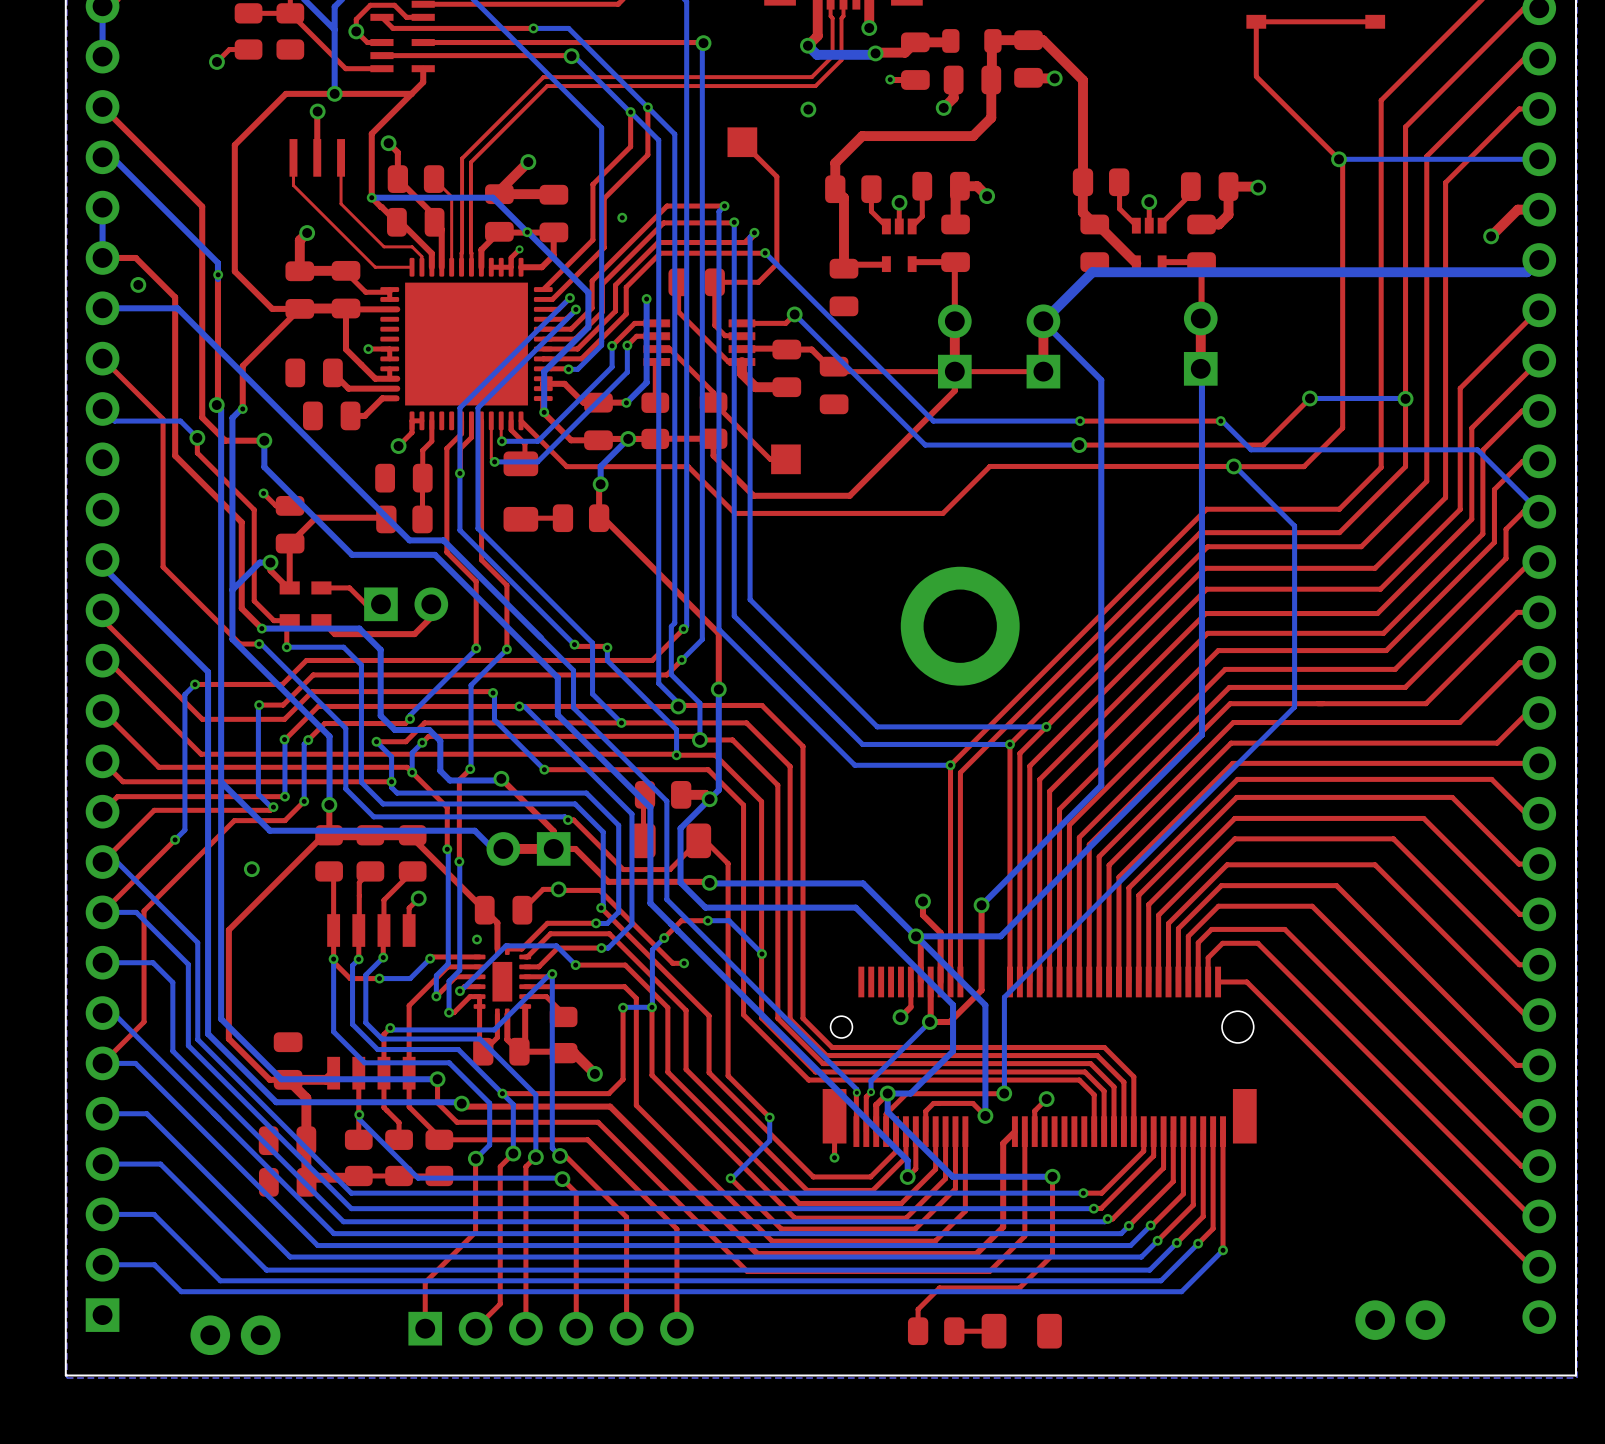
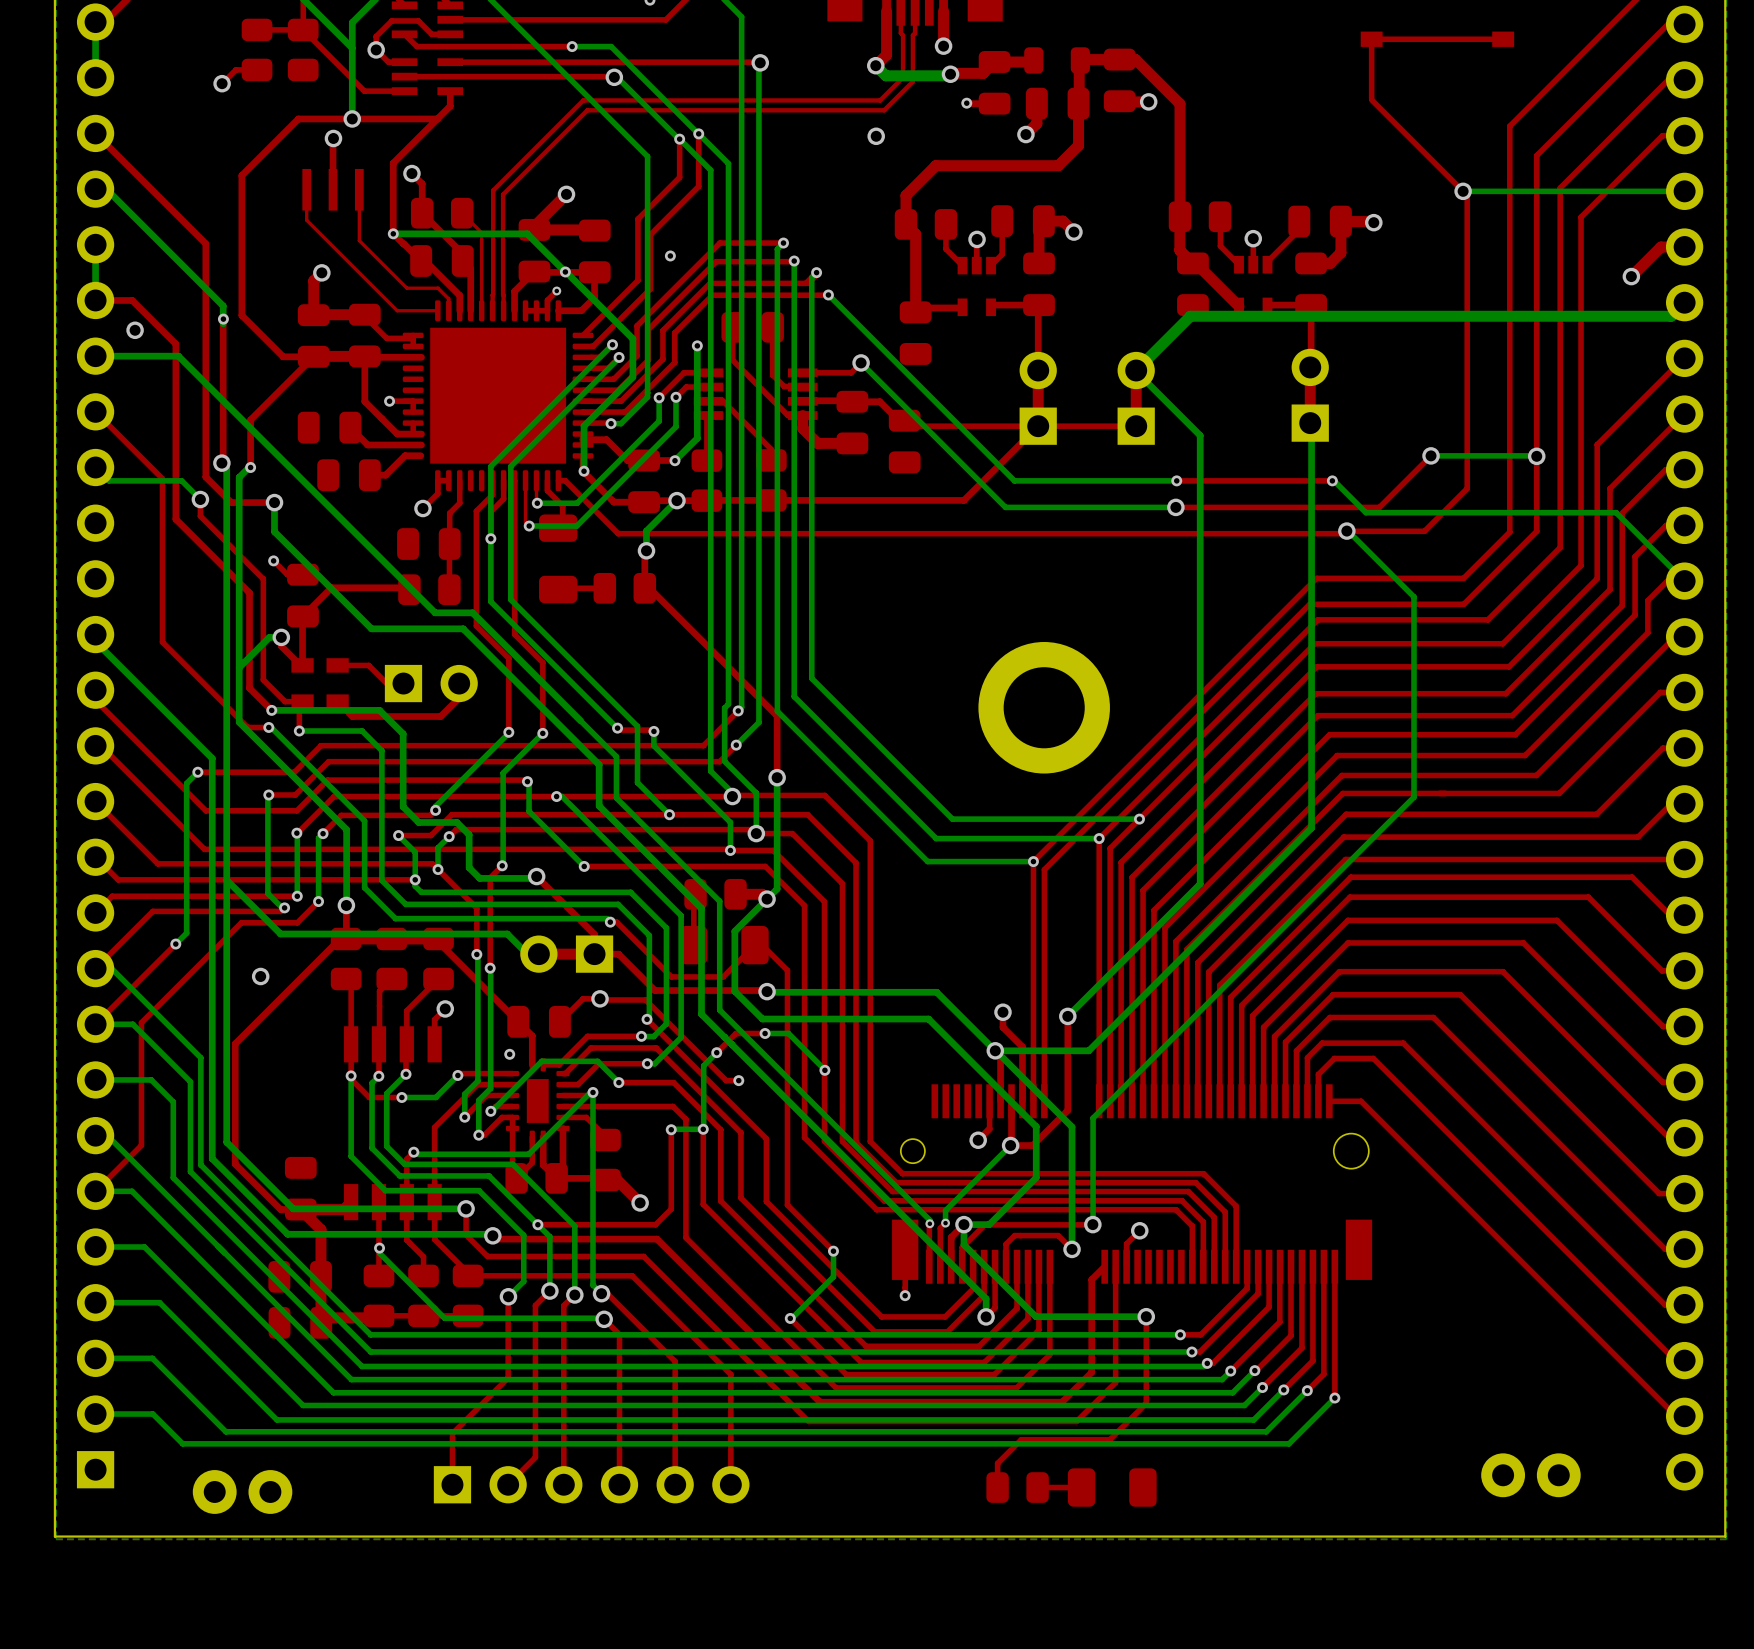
top track: (742, 142) (776, 176) (776, 263) (758, 282) (714, 282) -> none
part: (742, 142) -> none
top track: (954, 371) (954, 390) (849, 495) (753, 495) (713, 455) (713, 438) -> (1038, 426) (963, 500) (771, 500)
top track: (713, 402) (770, 459) (785, 459) -> none
top track: (521, 420) (566, 466) (688, 466) (735, 513) (942, 513) (989, 466) (1233, 466) -> (558, 480) (565, 480) (618, 533) (1344, 533) (1346, 531)
part: (785, 459) -> none

